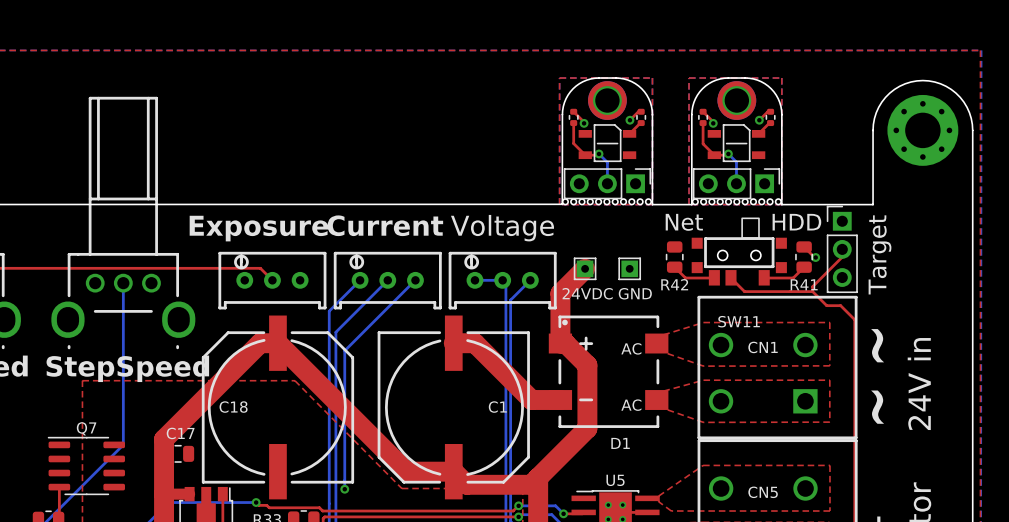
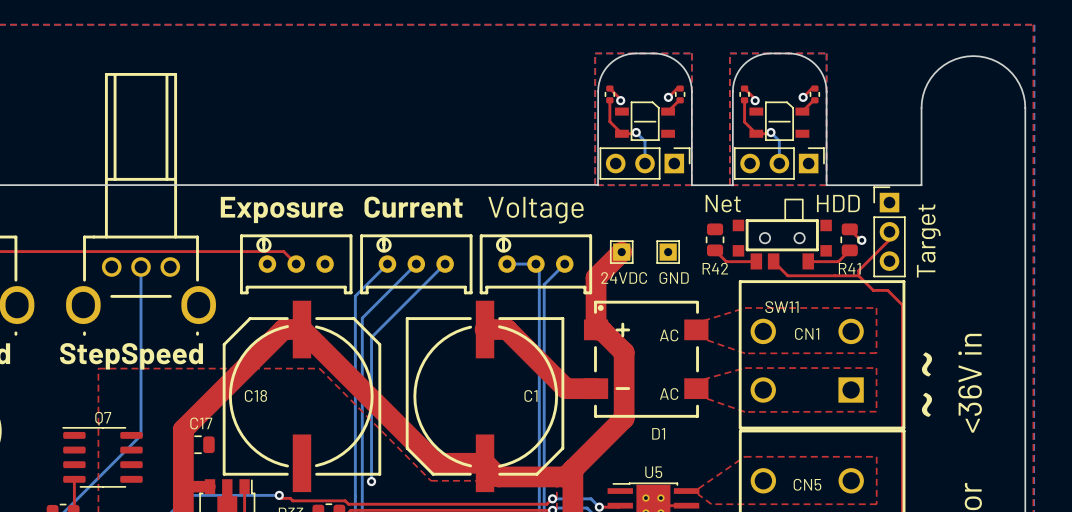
part: (607, 100) -> none
part: (736, 100) -> none
part: (922, 130) -> none
part: (606, 201) -> none
part: (736, 201) -> none
text: 24V in (919, 384) -> <36V in (970, 383)

